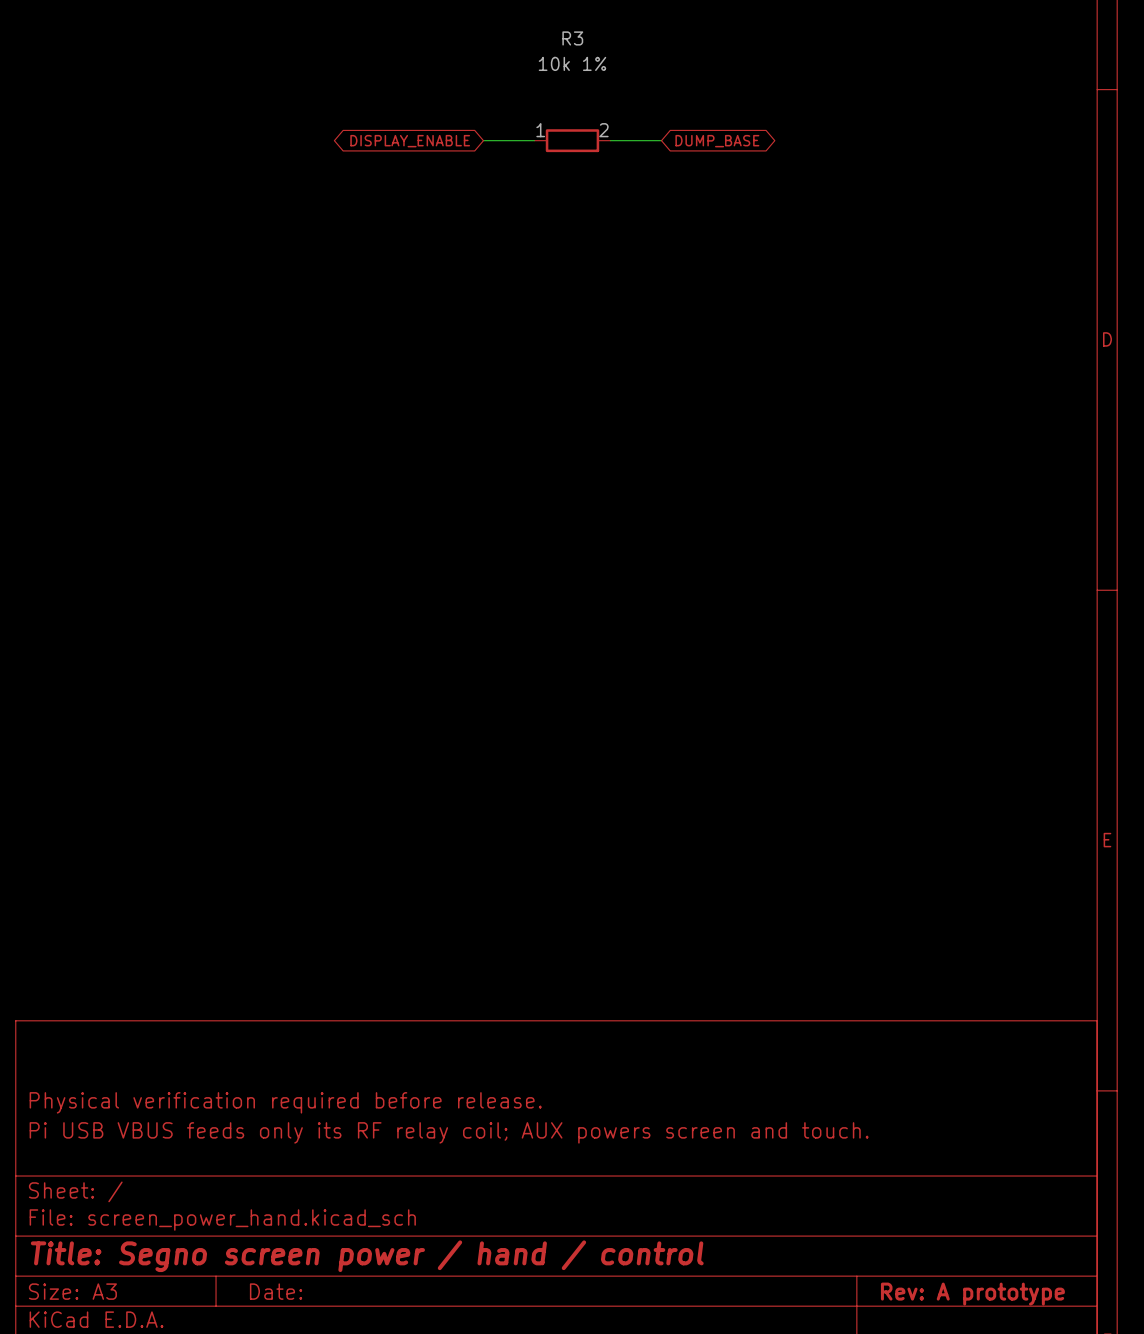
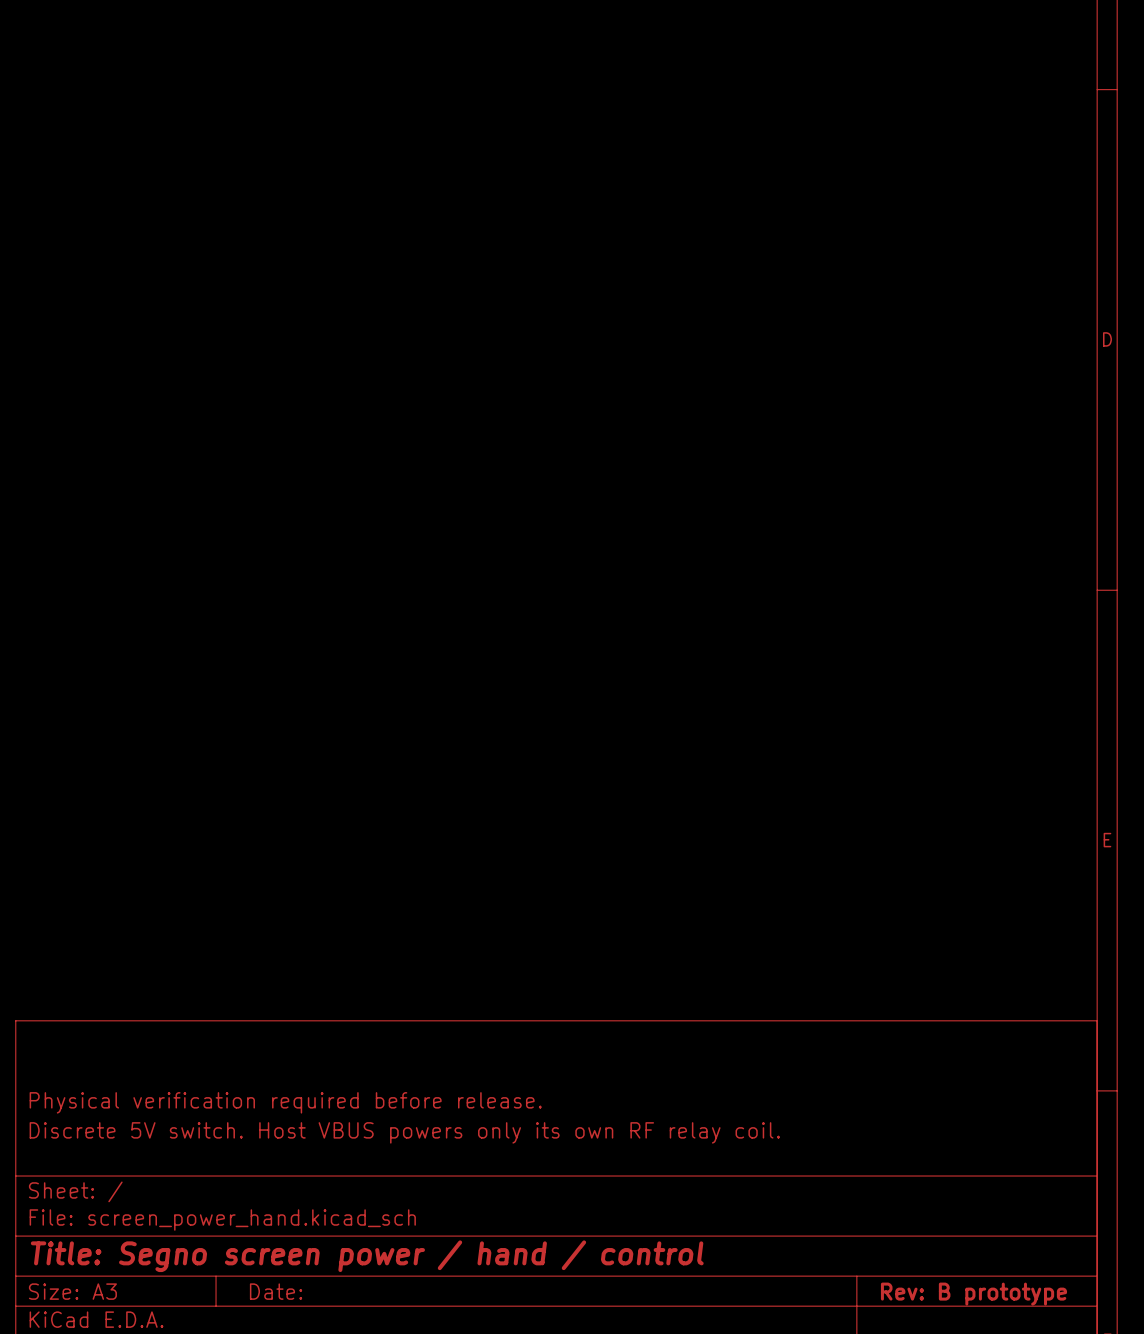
wire: (483, 140) (534, 140) -> none
R3: 10k 1% (572, 140) -> none
wire: (610, 140) (661, 140) -> none
global label: DISPLAY_ENABLE (410, 141) -> none
global label: DUMP_BASE (717, 141) -> none
title block: Pi USB VBUS feeds only its RF relay coil; AUX powers screen and touch. (449, 1132) -> Discrete 5V switch. Host VBUS powers only its own RF relay coil. (404, 1132)
title block: Rev: A prototype (972, 1294) -> Rev: B prototype (973, 1294)

